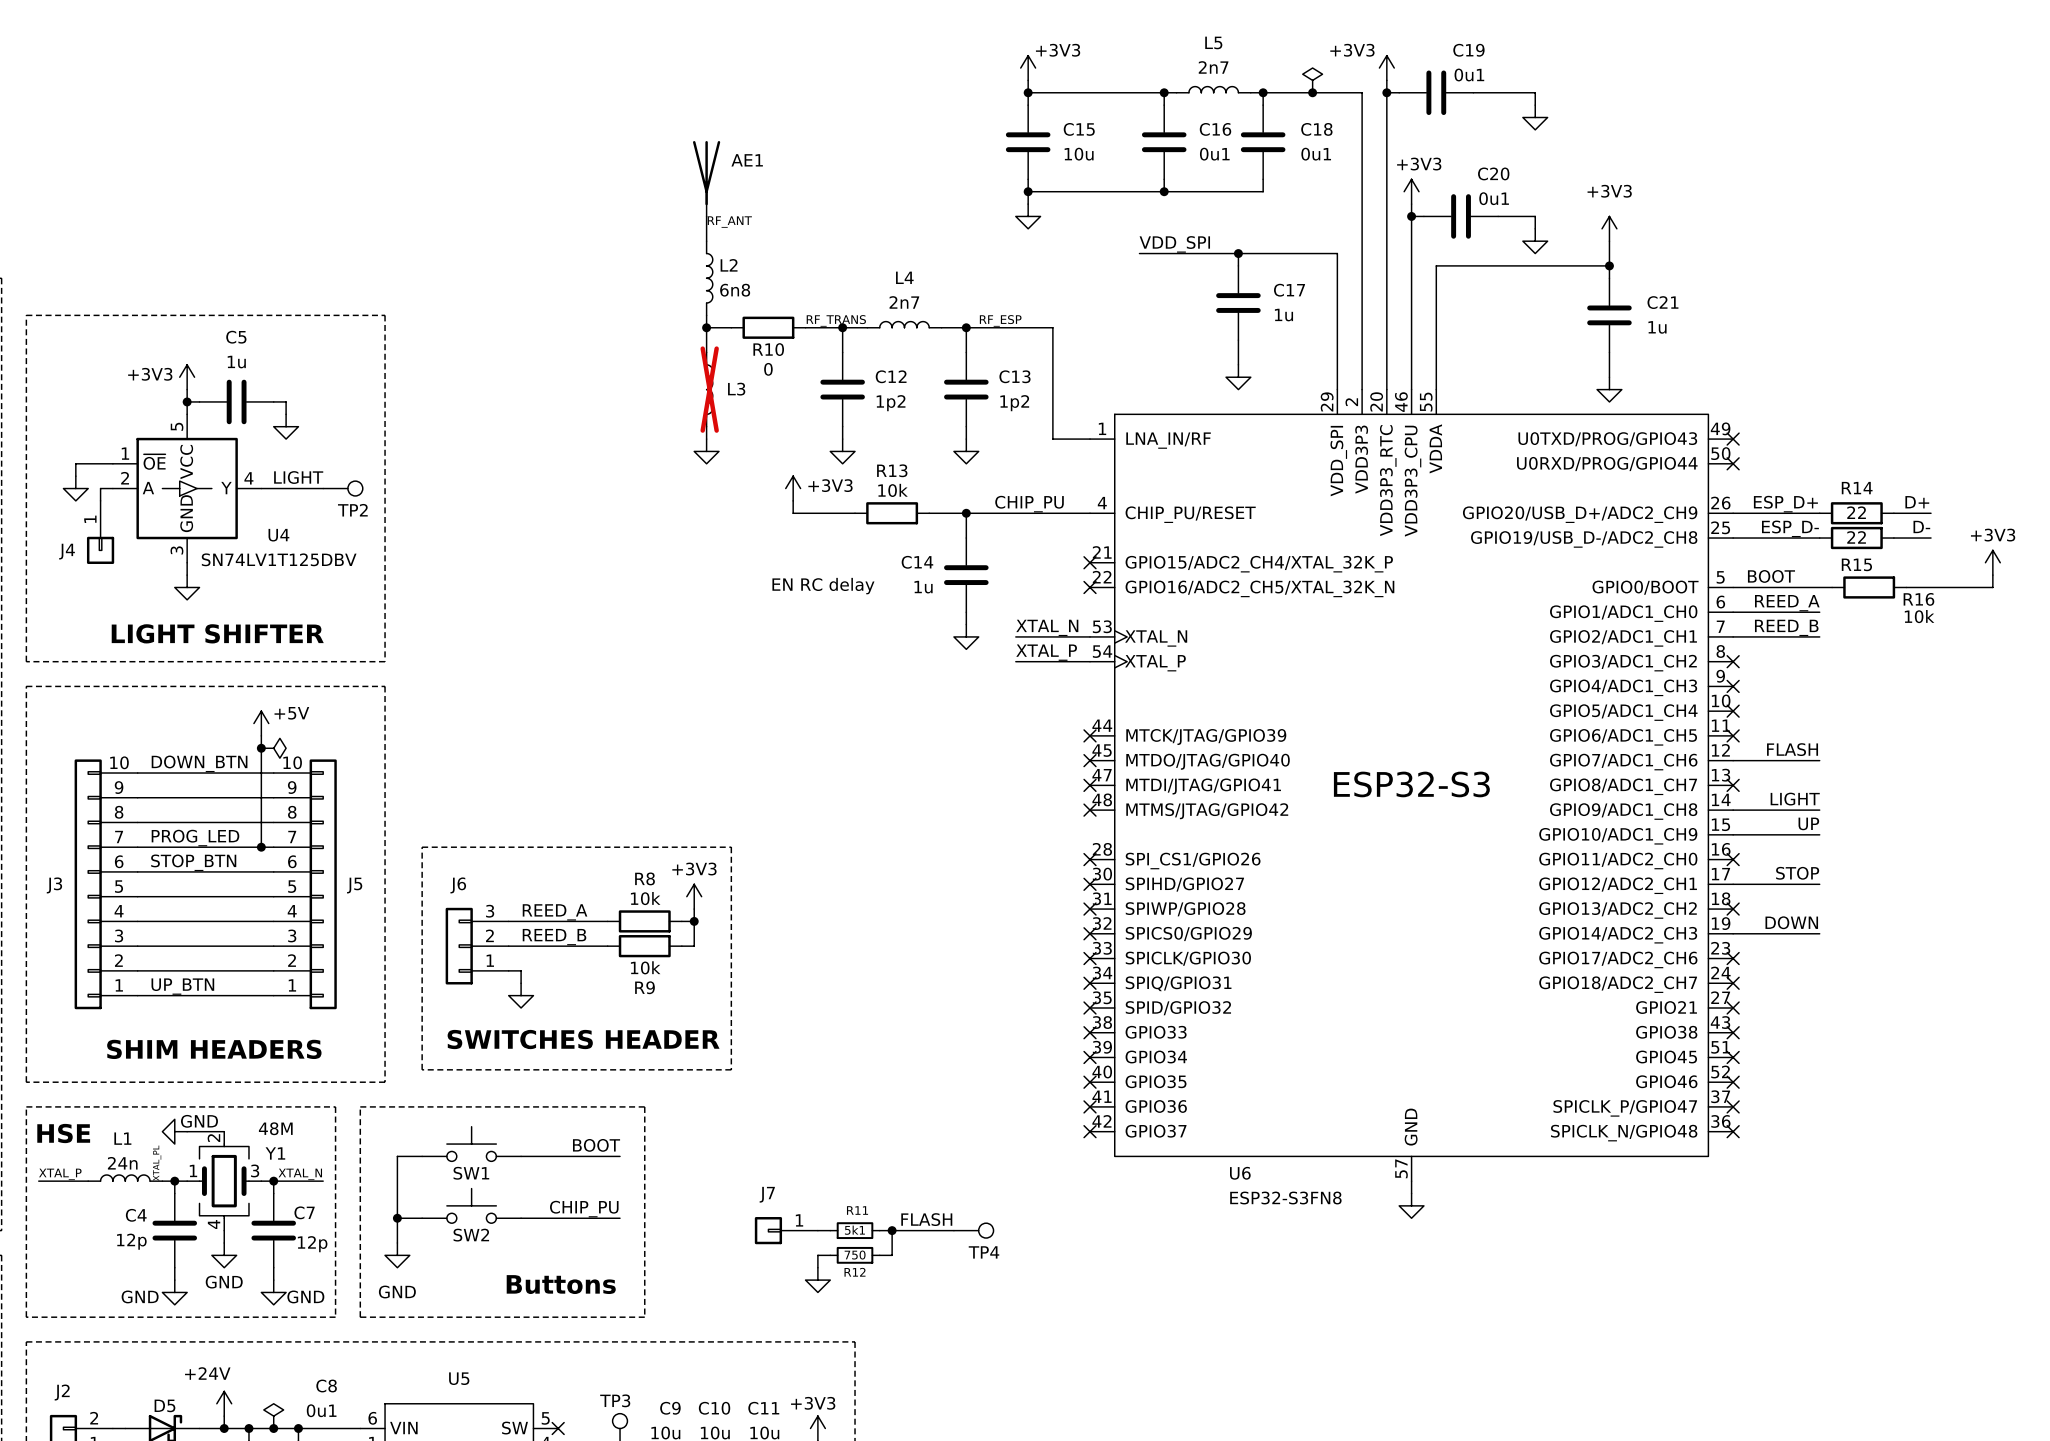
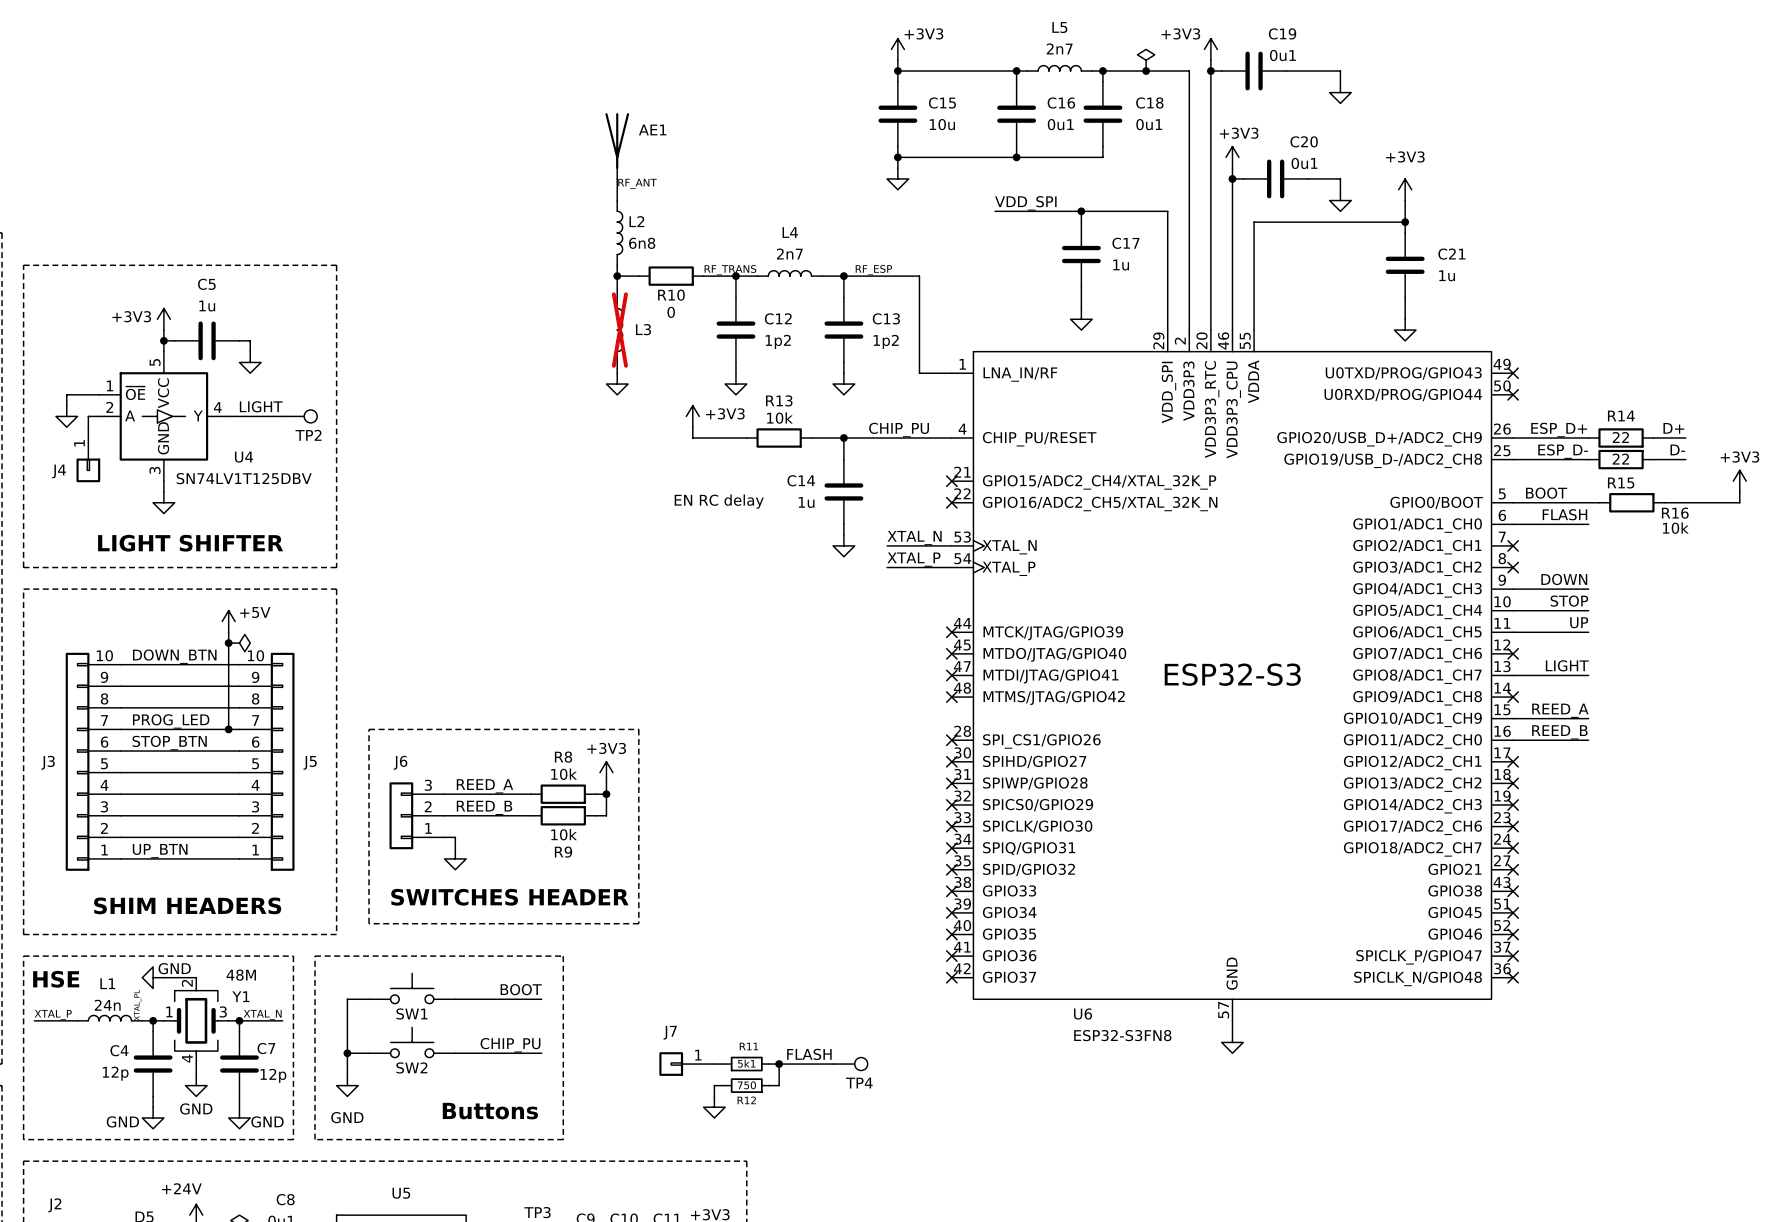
label: REED_A (1787, 603) -> FLASH (1564, 514)
label position: REED_B (1786, 627) -> REED_B (1559, 732)
wire: (1733, 636) (1819, 636) -> (1513, 589) (1588, 589)
no-connect mark: none -> (1513, 545)
label: none -> DOWN (1564, 579)
no-connect mark: (1733, 686) -> none
no-connect mark: (1733, 711) -> none
label: none -> UP (1579, 622)
no-connect mark: (1733, 735) -> none
label: FLASH (1792, 749) -> none
wire: (1733, 760) (1819, 760) -> (1513, 632) (1588, 632)
no-connect mark: none -> (1513, 653)
no-connect mark: (1733, 785) -> none
label position: LIGHT (1795, 799) -> LIGHT (1567, 665)
wire: (1733, 810) (1819, 810) -> (1513, 675) (1588, 675)
no-connect mark: none -> (1513, 697)
label: UP (1808, 823) -> REED_A (1560, 710)
no-connect mark: (1733, 859) -> none
label position: STOP (1797, 873) -> STOP (1569, 601)
wire: (1733, 884) (1819, 884) -> (1513, 740) (1588, 740)
no-connect mark: none -> (1513, 761)
label: DOWN (1791, 922) -> none
wire: (1733, 933) (1819, 933) -> (1513, 610) (1588, 610)
no-connect mark: none -> (1513, 804)

